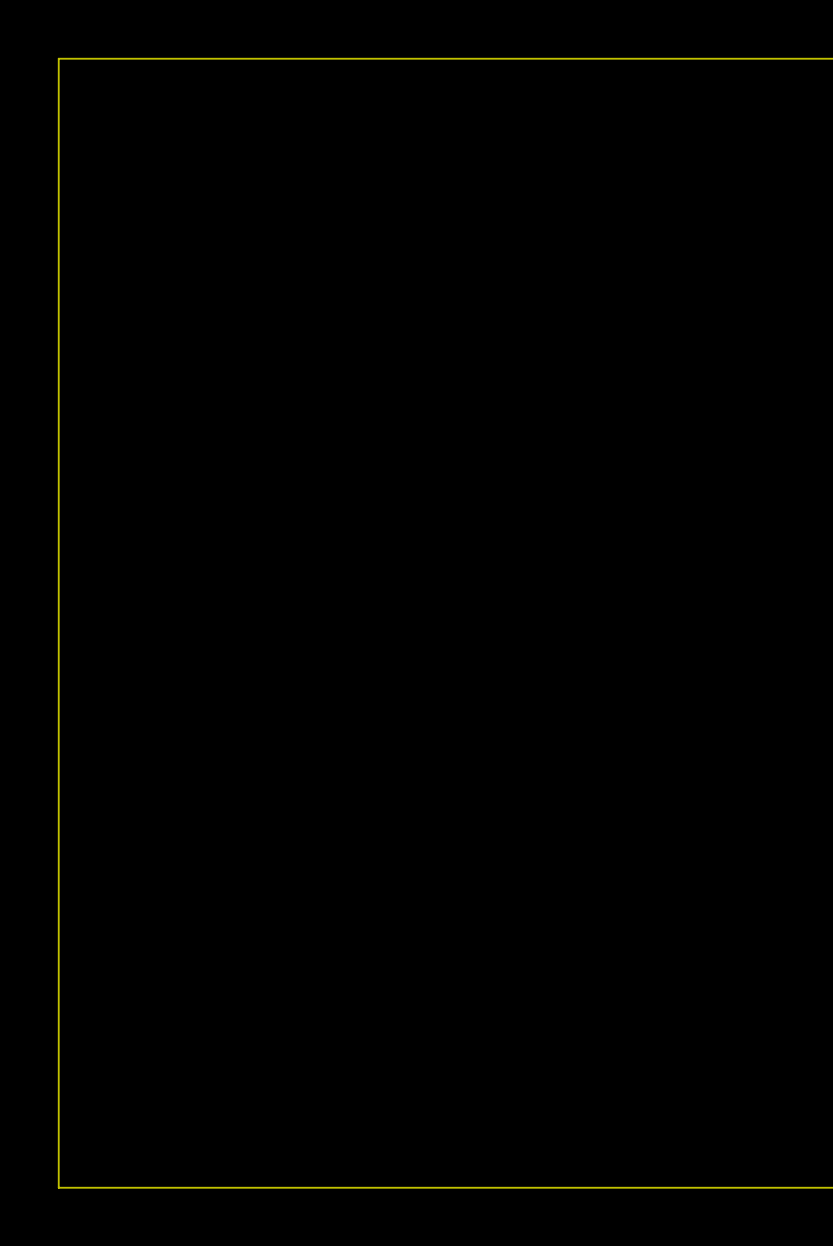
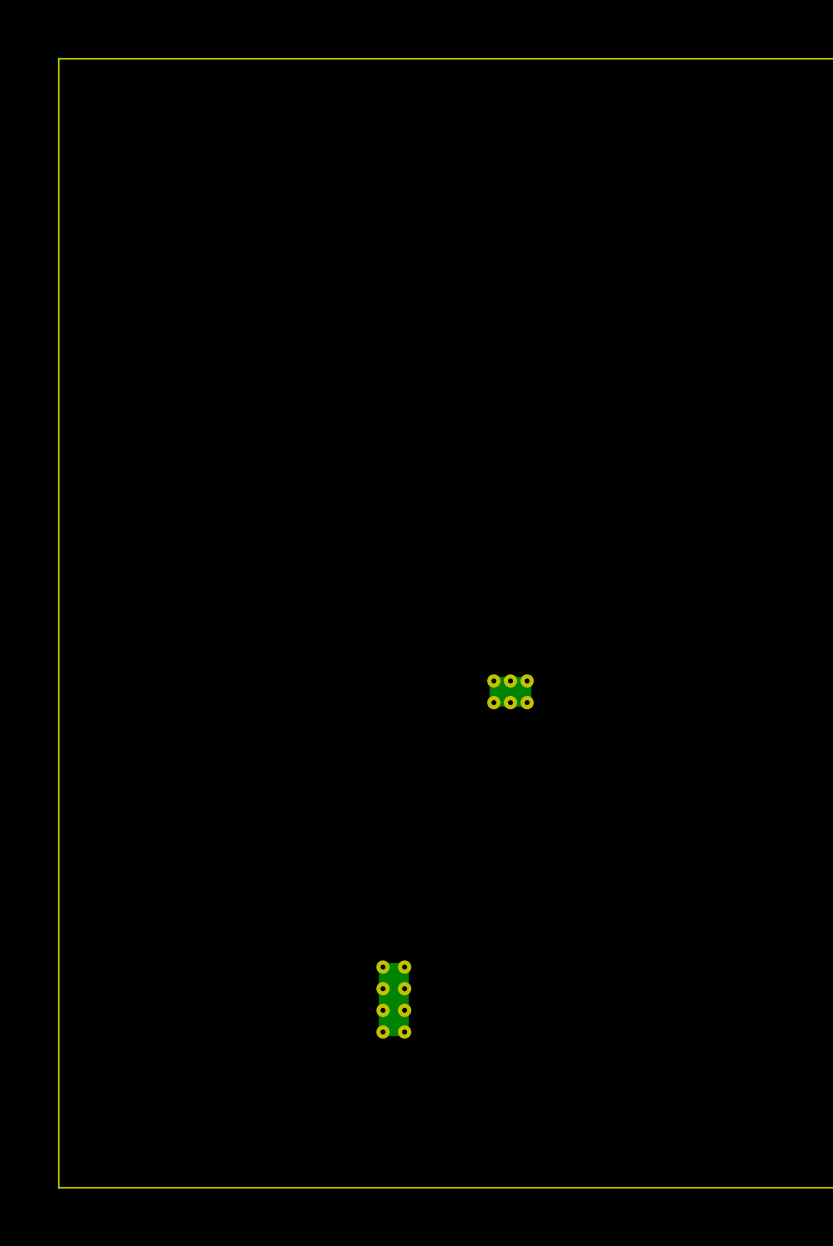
part: none -> (510, 691)
part: none -> (393, 999)

